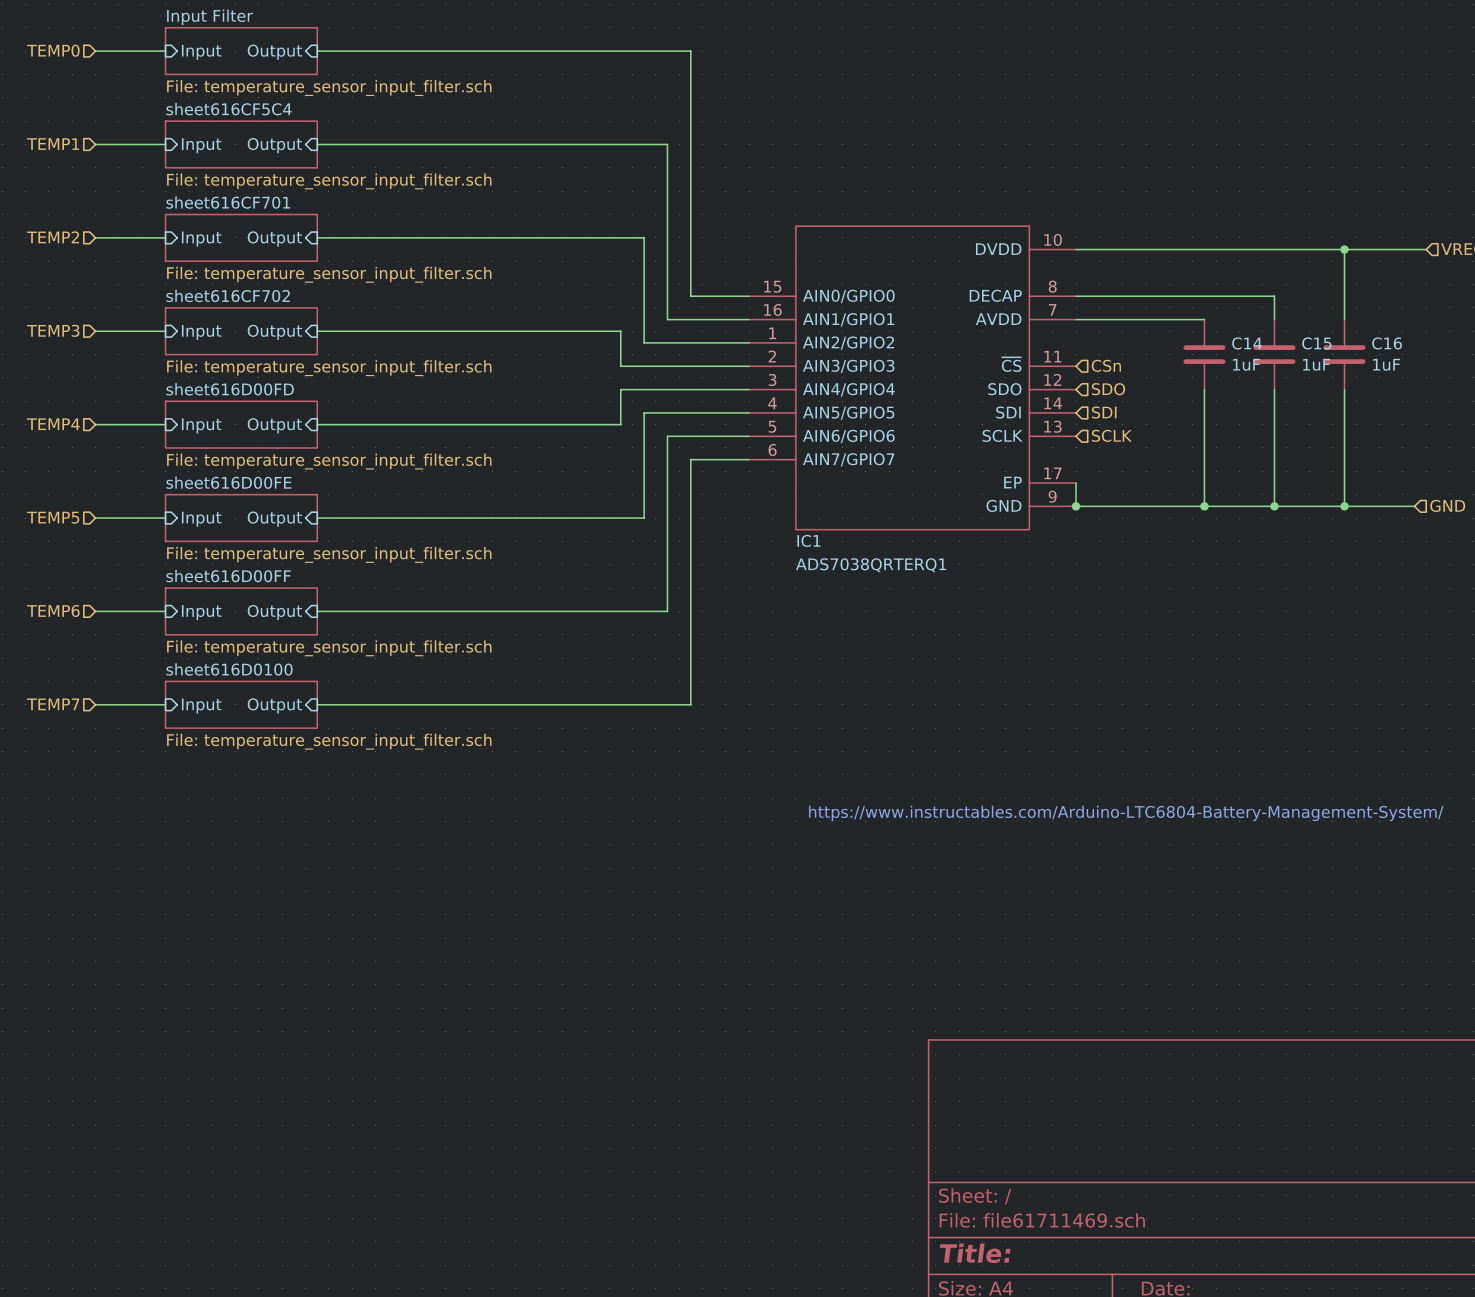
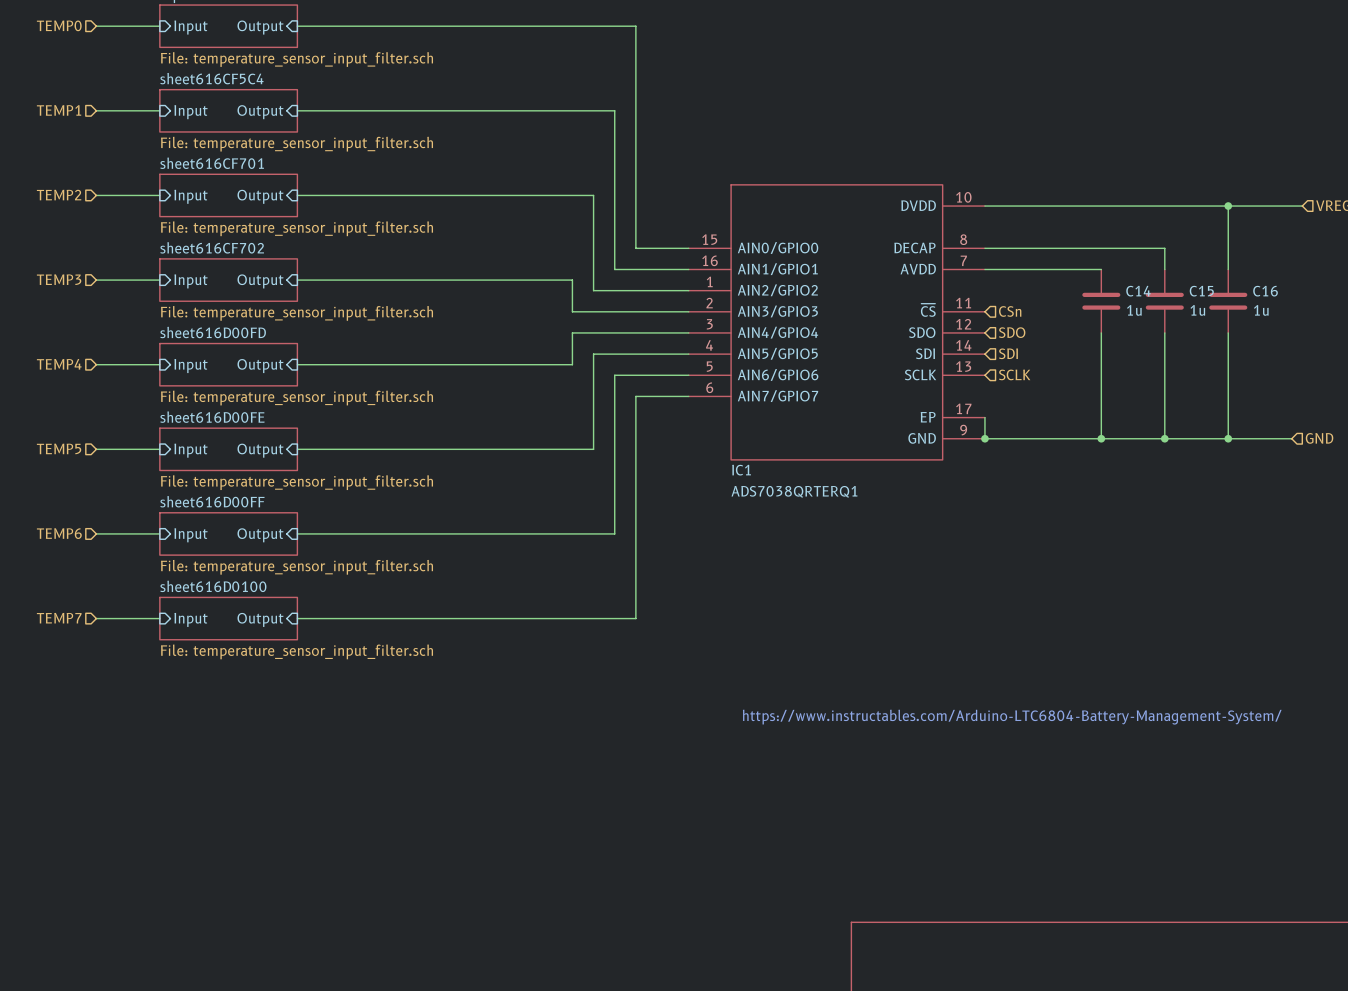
C14 value: 1uF (1246, 364) -> 1u (1134, 310)
C15 value: 1uF (1316, 364) -> 1u (1197, 310)
C16 value: 1uF (1386, 364) -> 1u (1261, 310)

